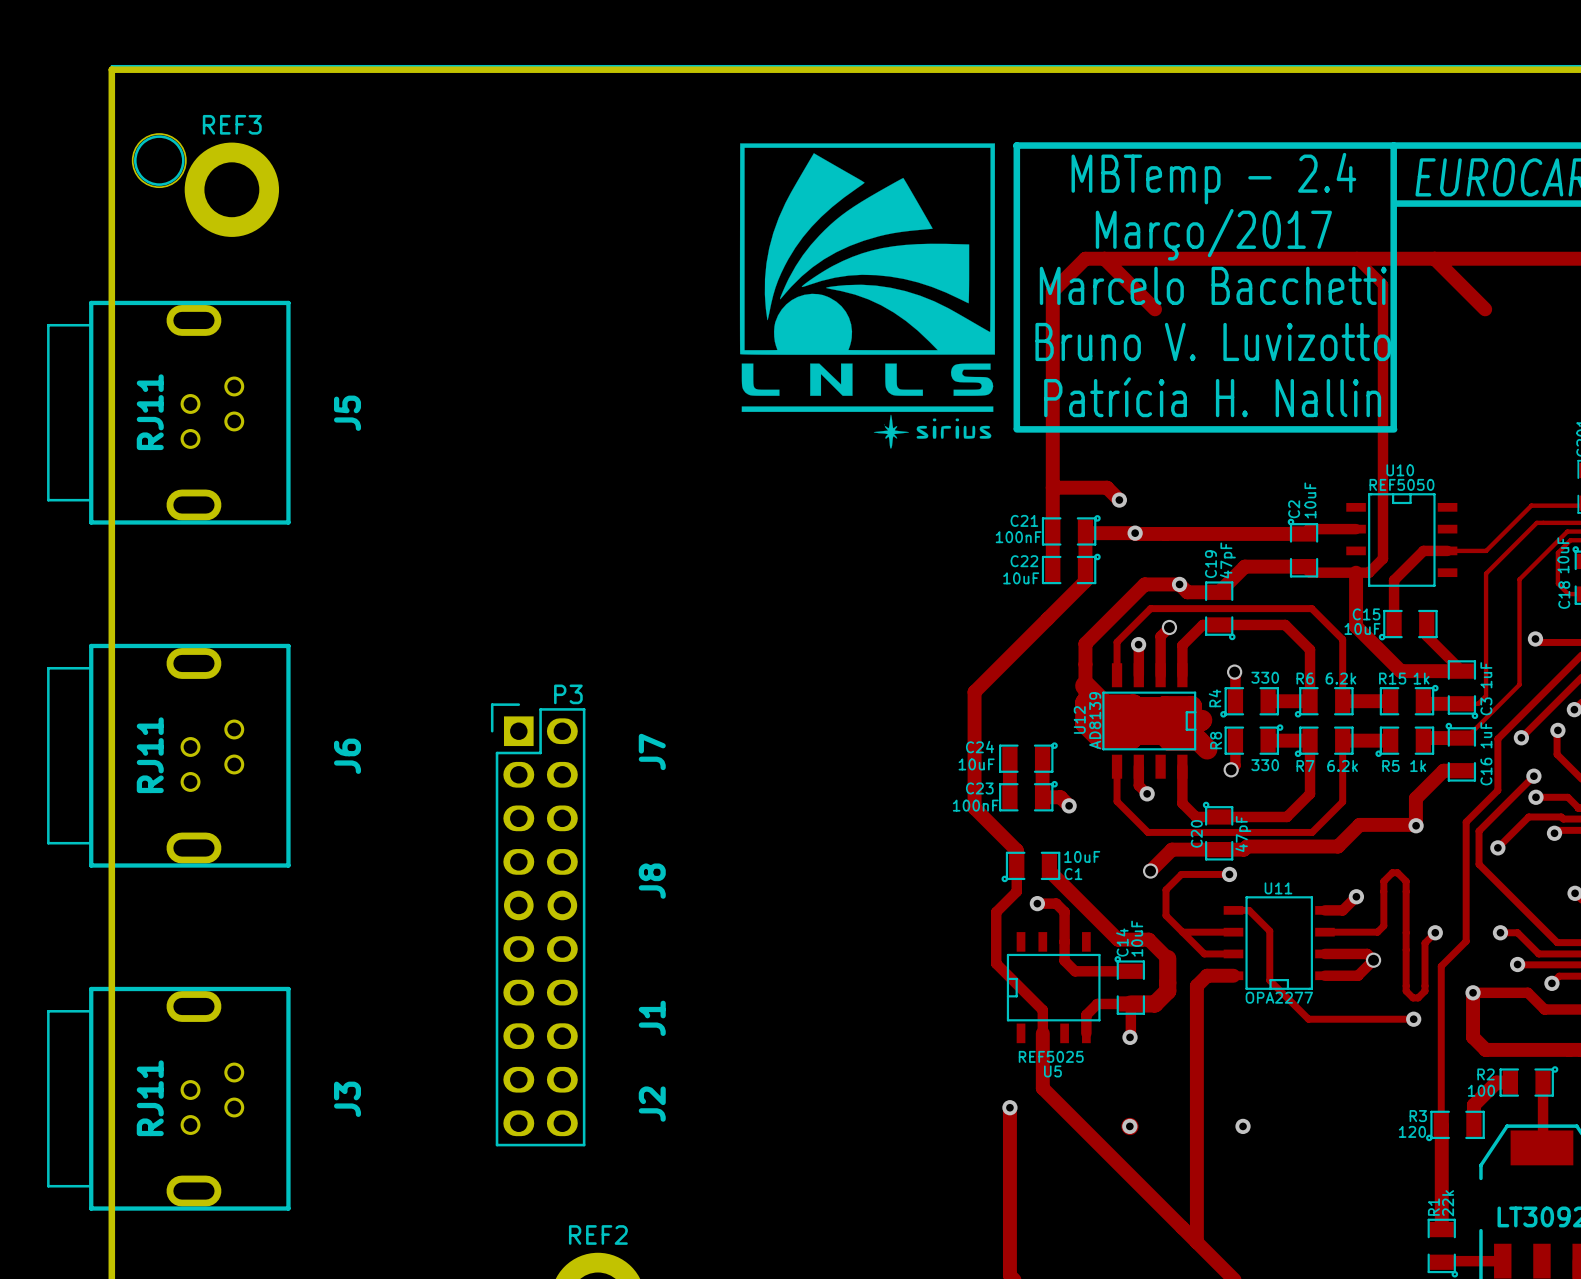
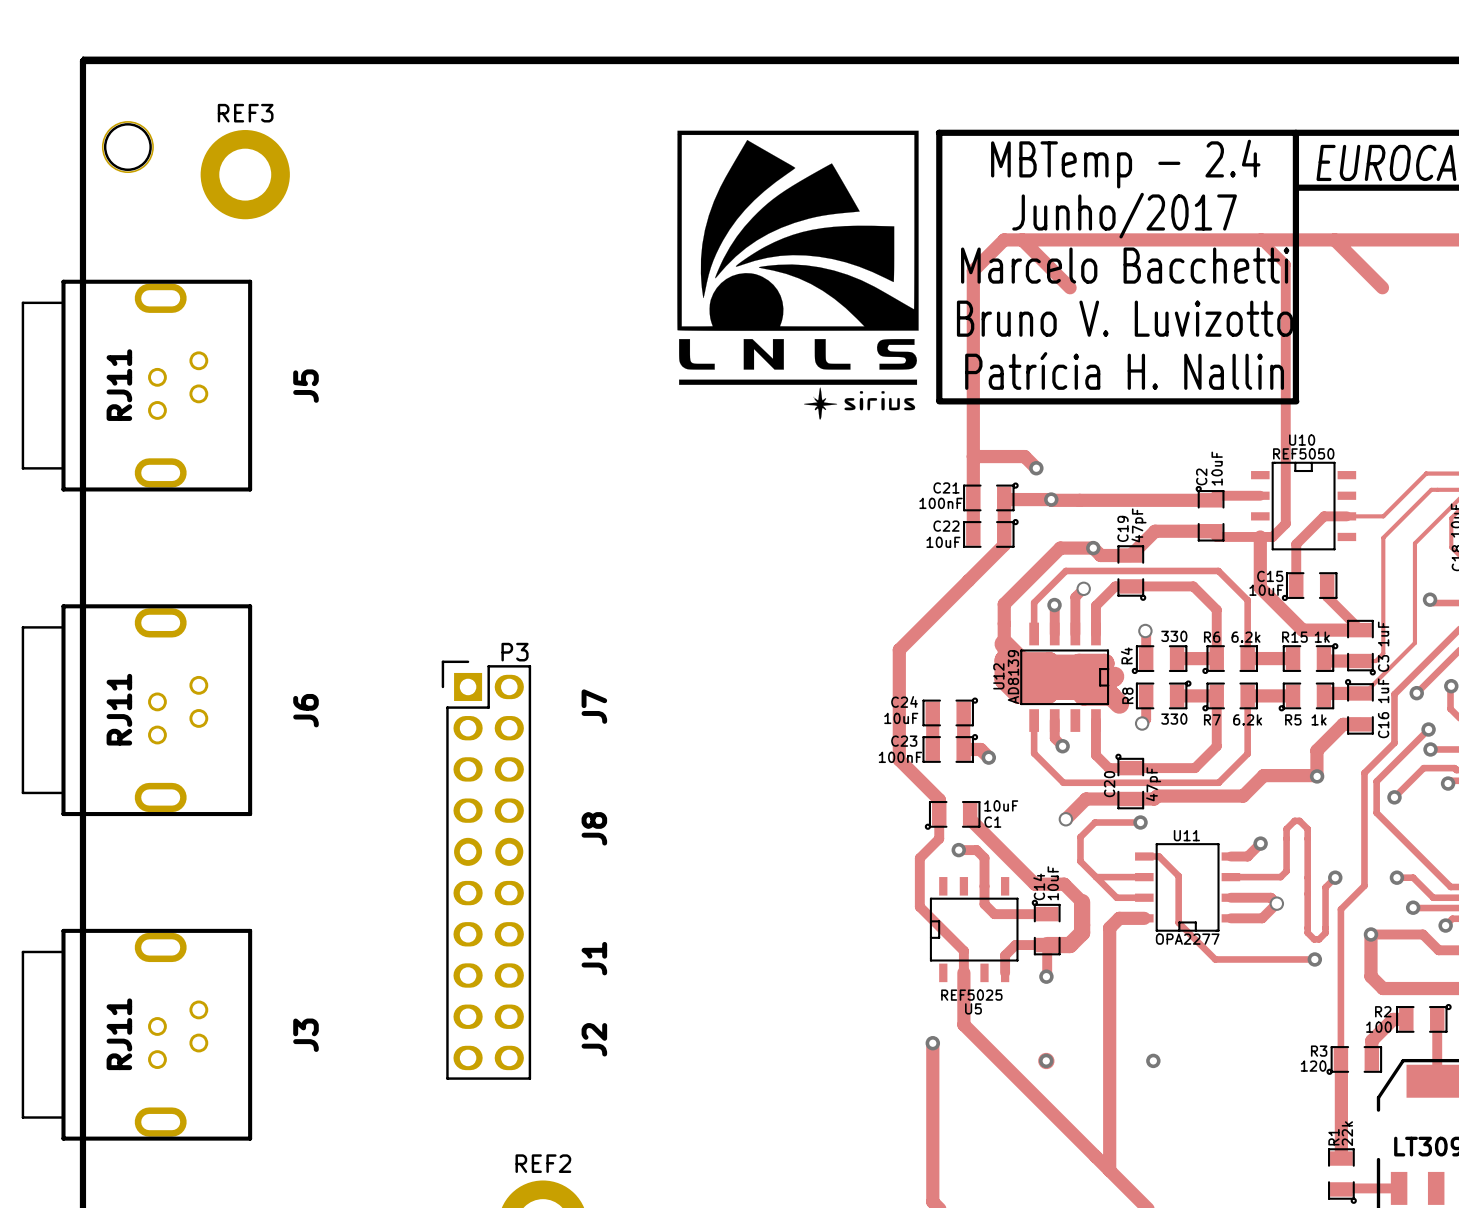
REF3 position: (231, 189) -> (245, 174)
text: Março/2017 (1213, 234) -> Junho/2017 (1124, 215)

